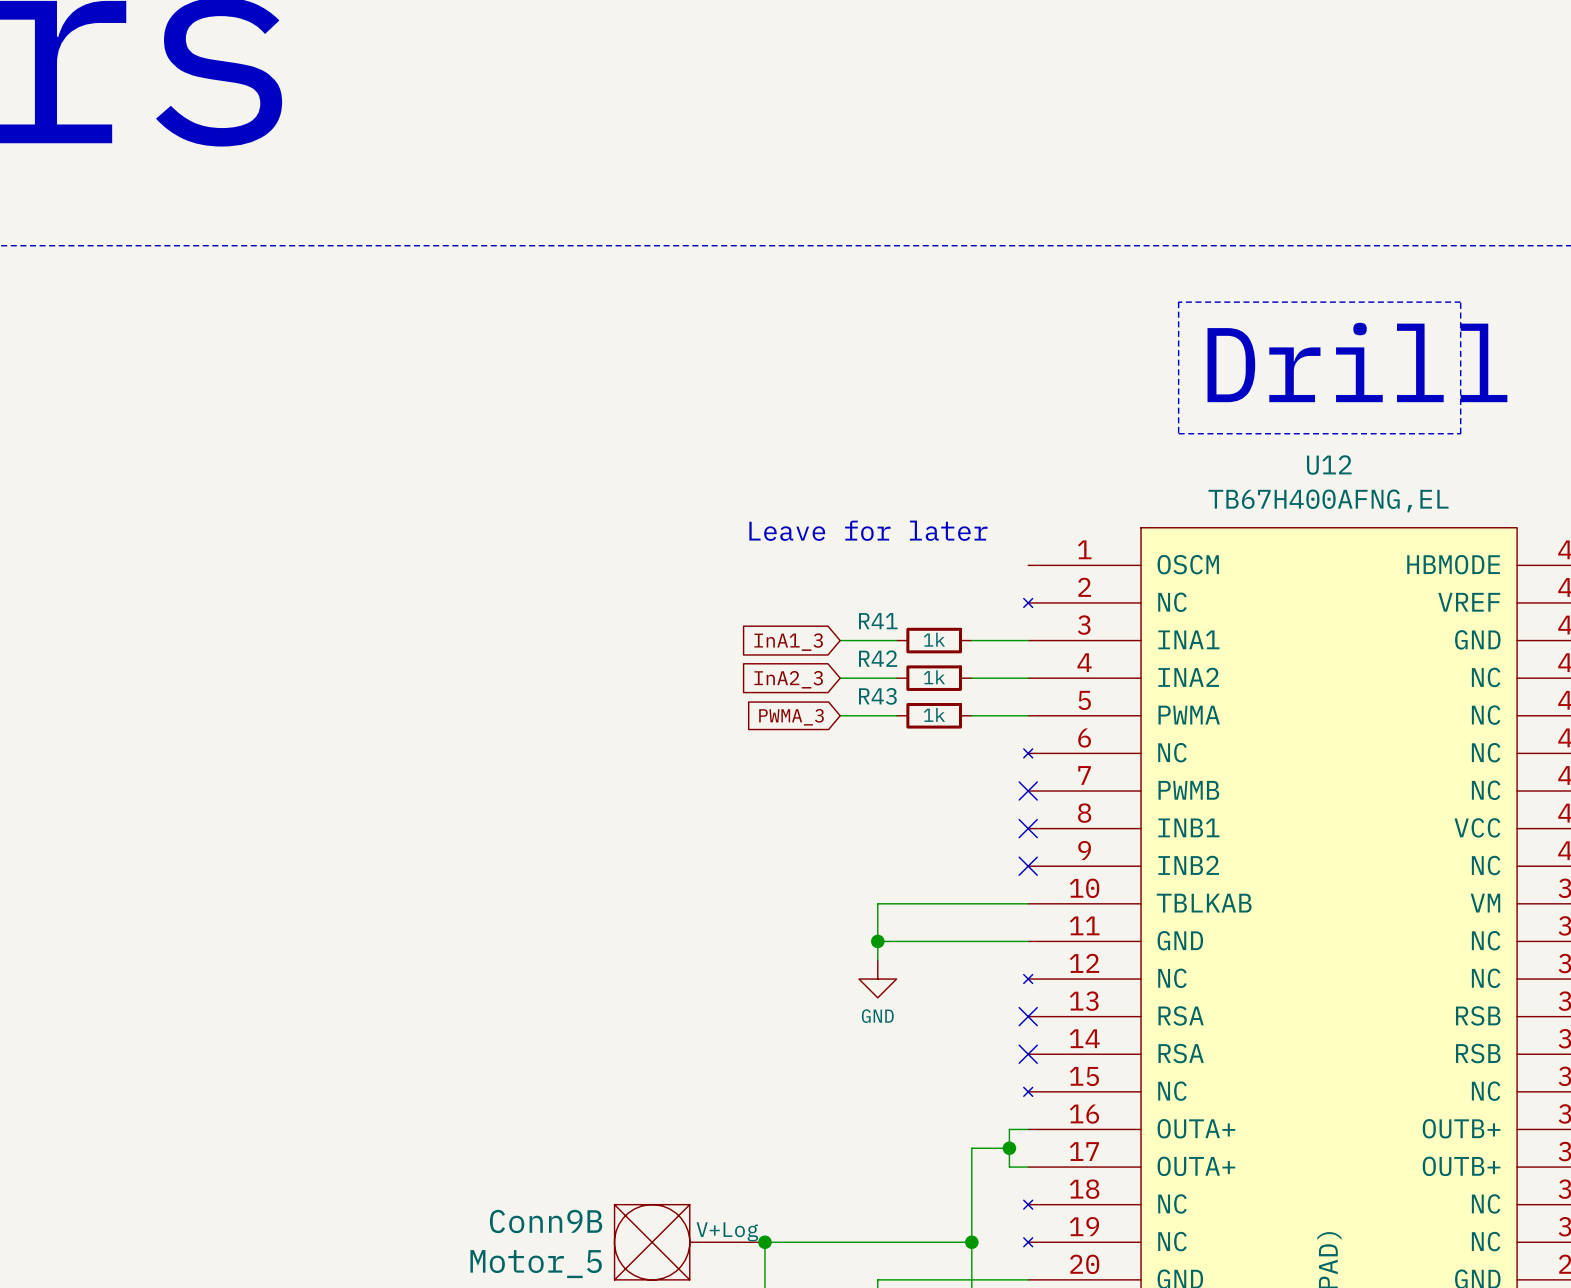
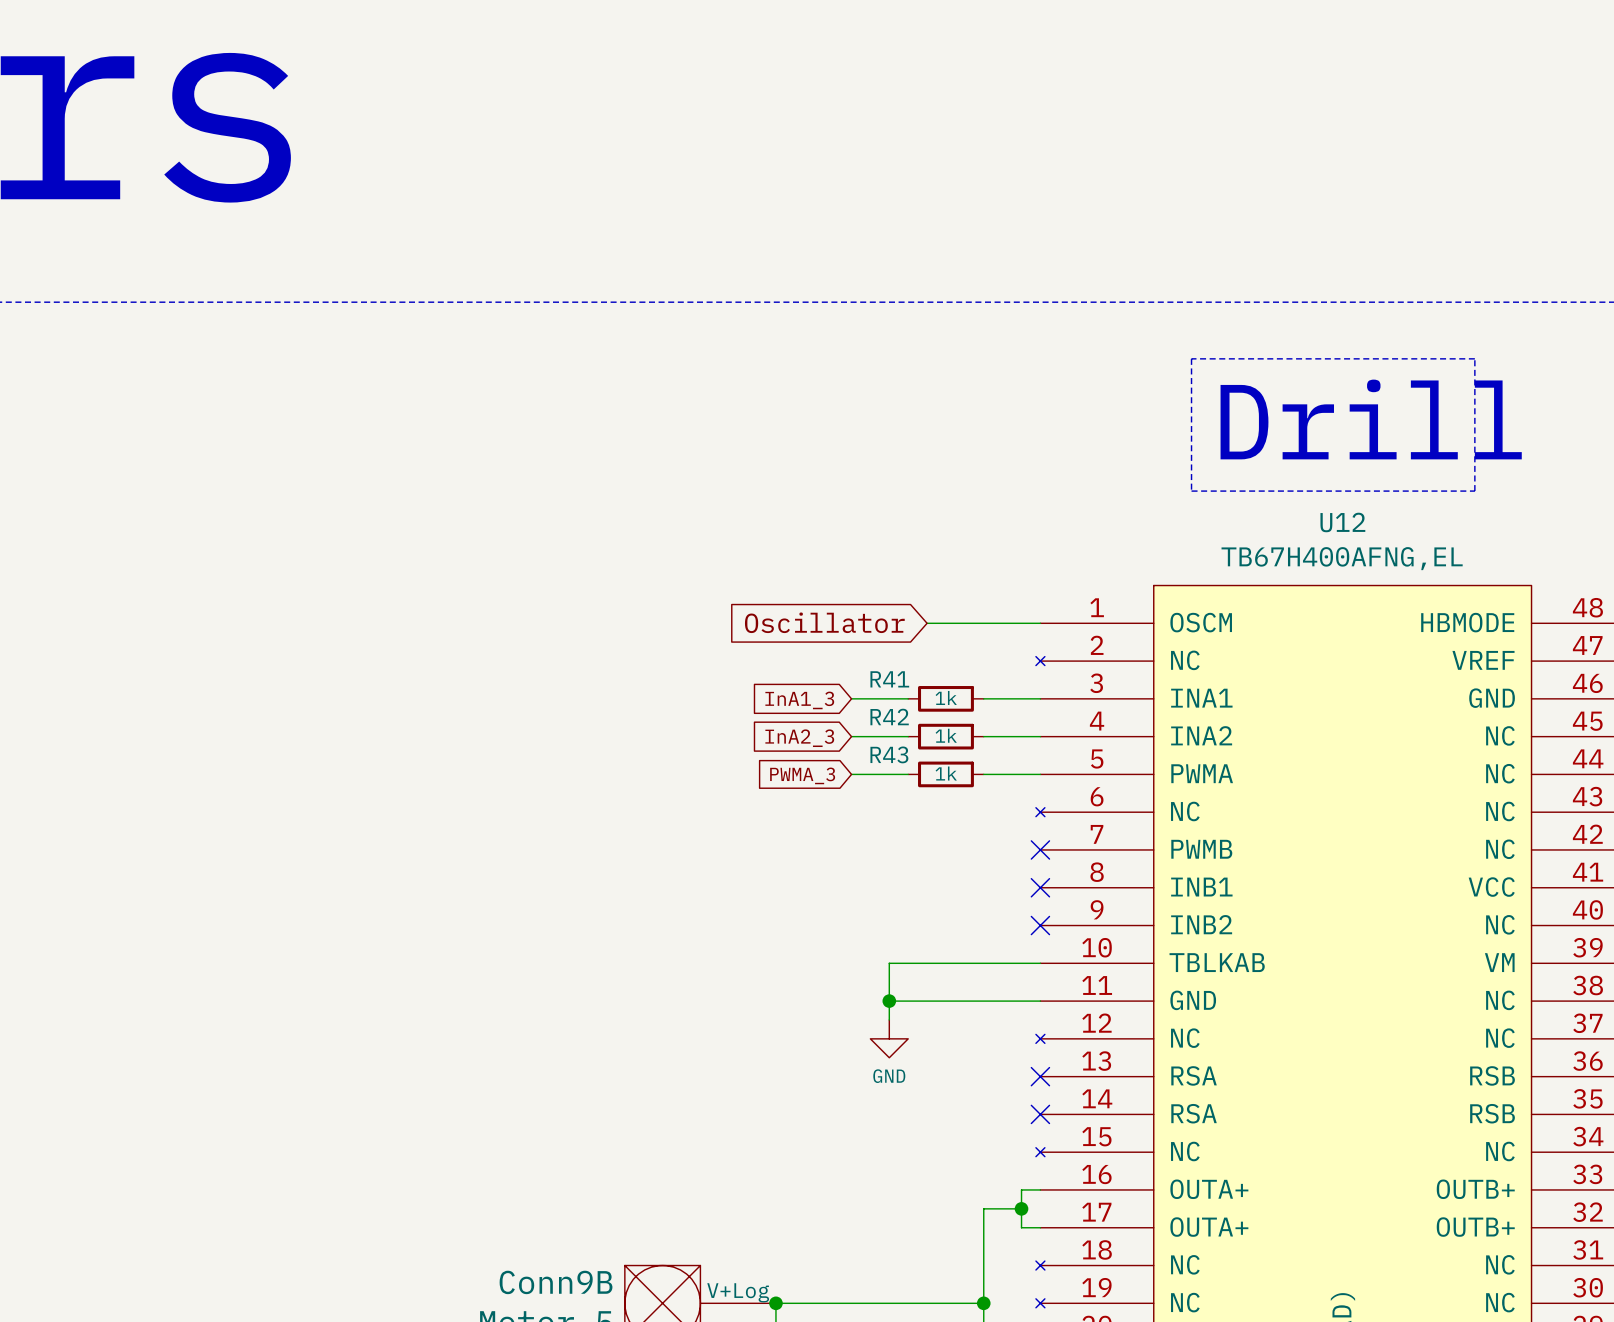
text: Leave for later (868, 530) -> none
global label: none -> Oscillator (824, 622)
wire: none -> (927, 623) (1040, 623)

